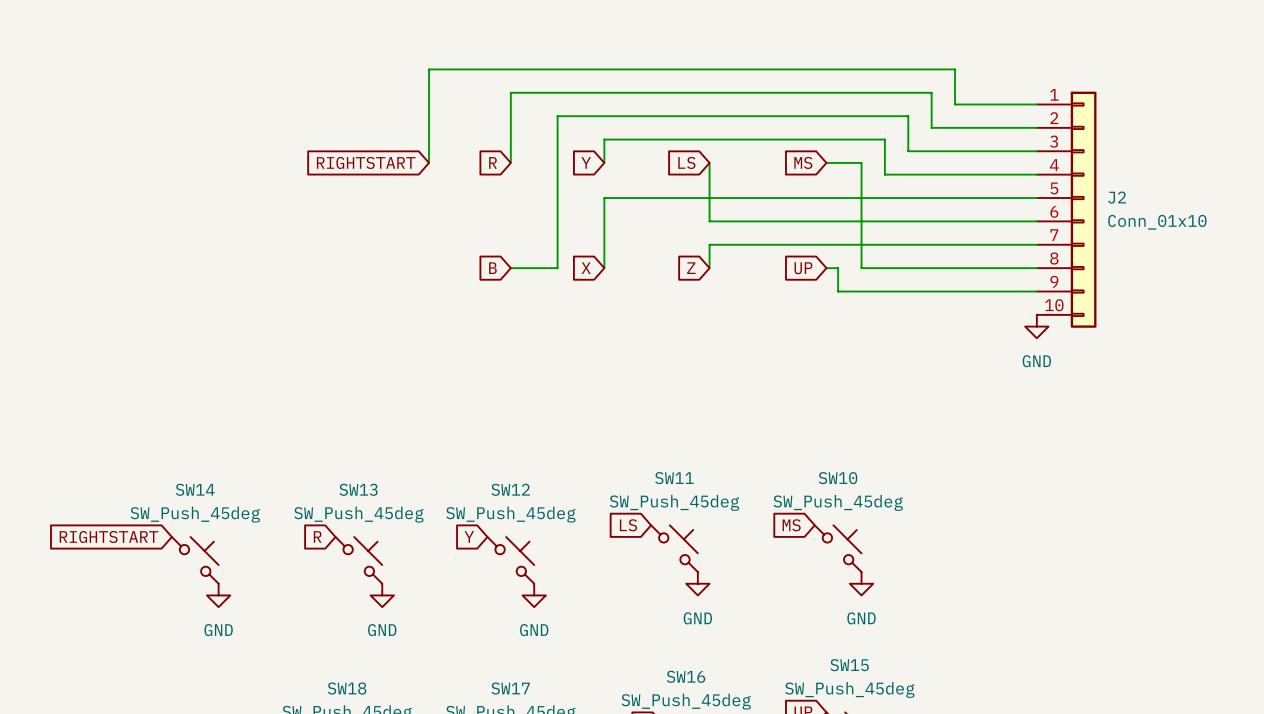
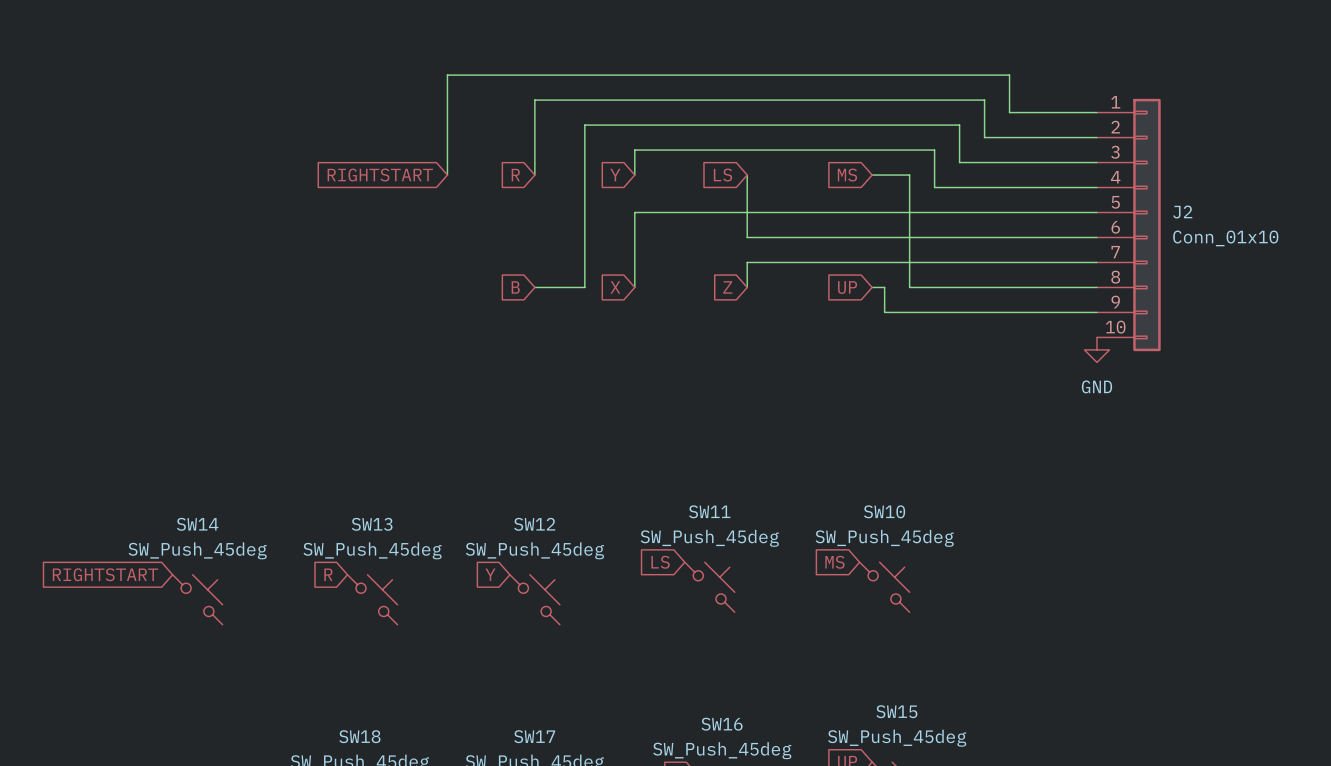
power symbol: GND (697, 583) -> none
power symbol: GND (861, 583) -> none
power symbol: GND (218, 595) -> none
power symbol: GND (382, 595) -> none
power symbol: GND (534, 595) -> none

